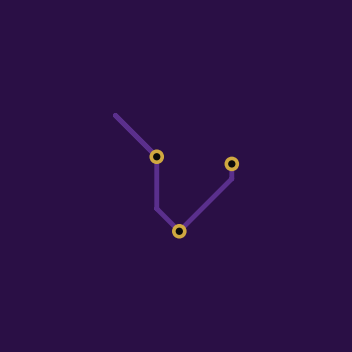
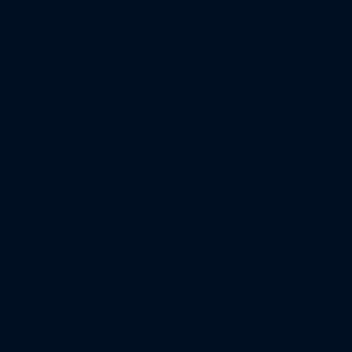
track: (115, 115) (156, 156) (156, 208) (179, 231) (231, 178) (231, 163) -> none
via: (156, 156) -> none
via: (231, 163) -> none
via: (179, 231) -> none

